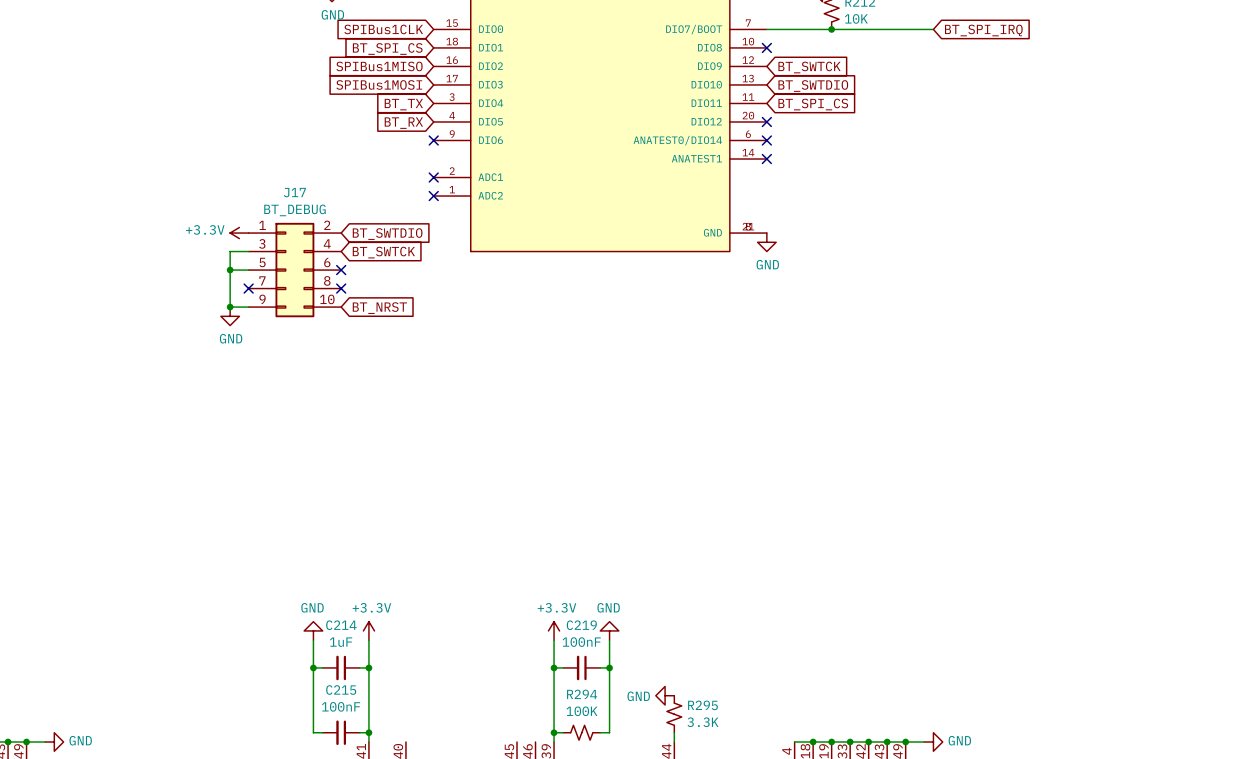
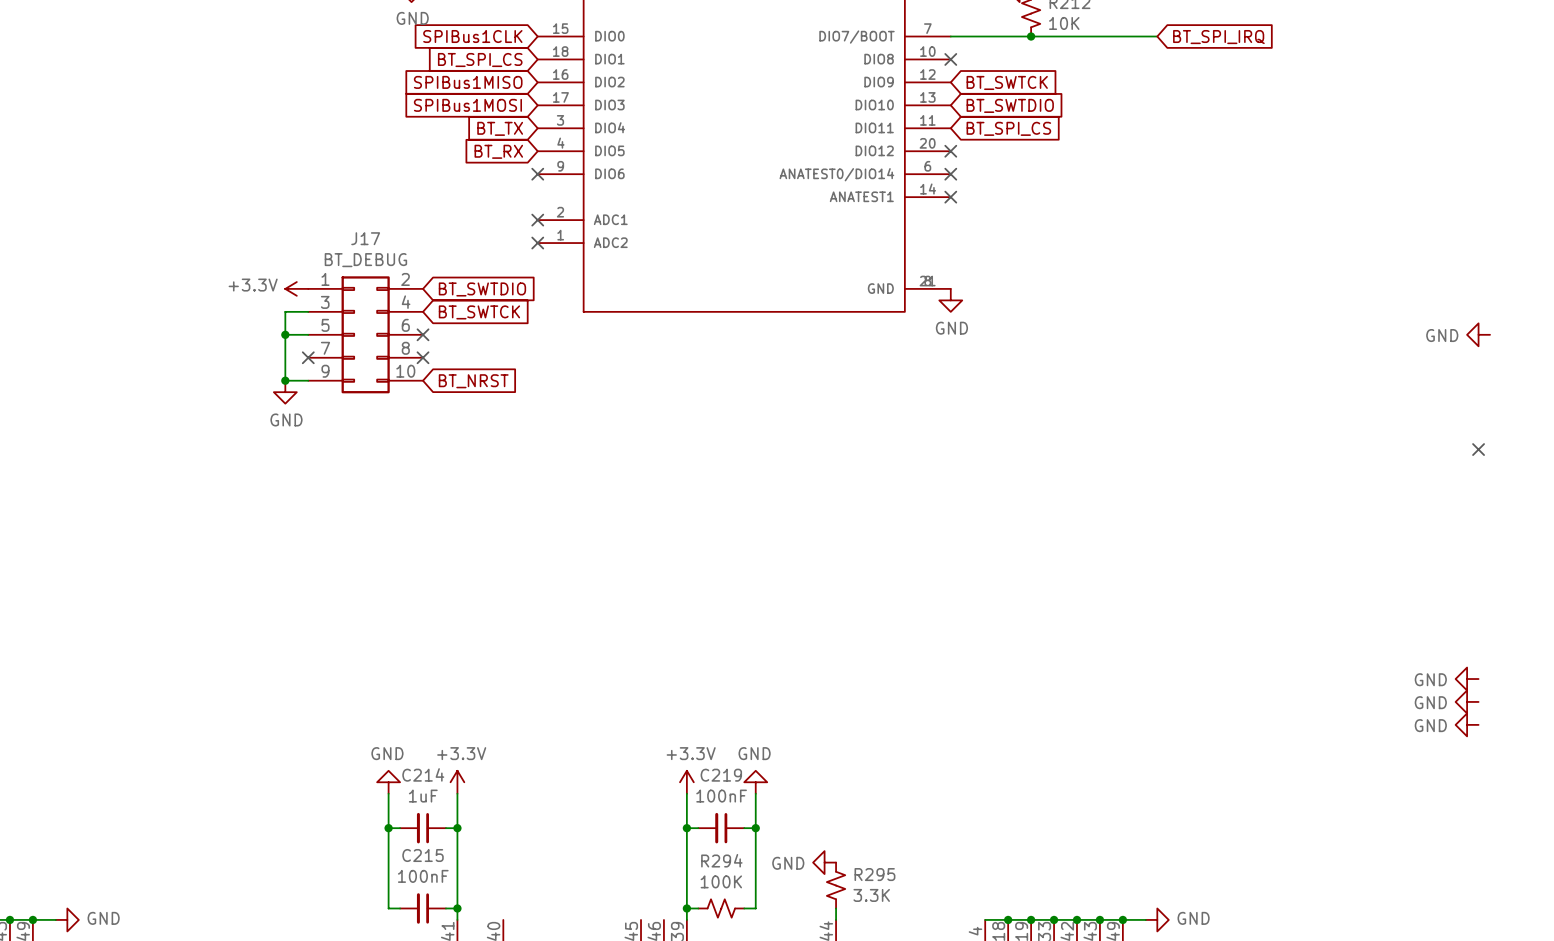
power symbol: none -> GND (1478, 334)
no-connect mark: none -> (1478, 449)
power symbol: none -> GND (1467, 679)
power symbol: none -> GND (1467, 701)
power symbol: none -> GND (1467, 724)

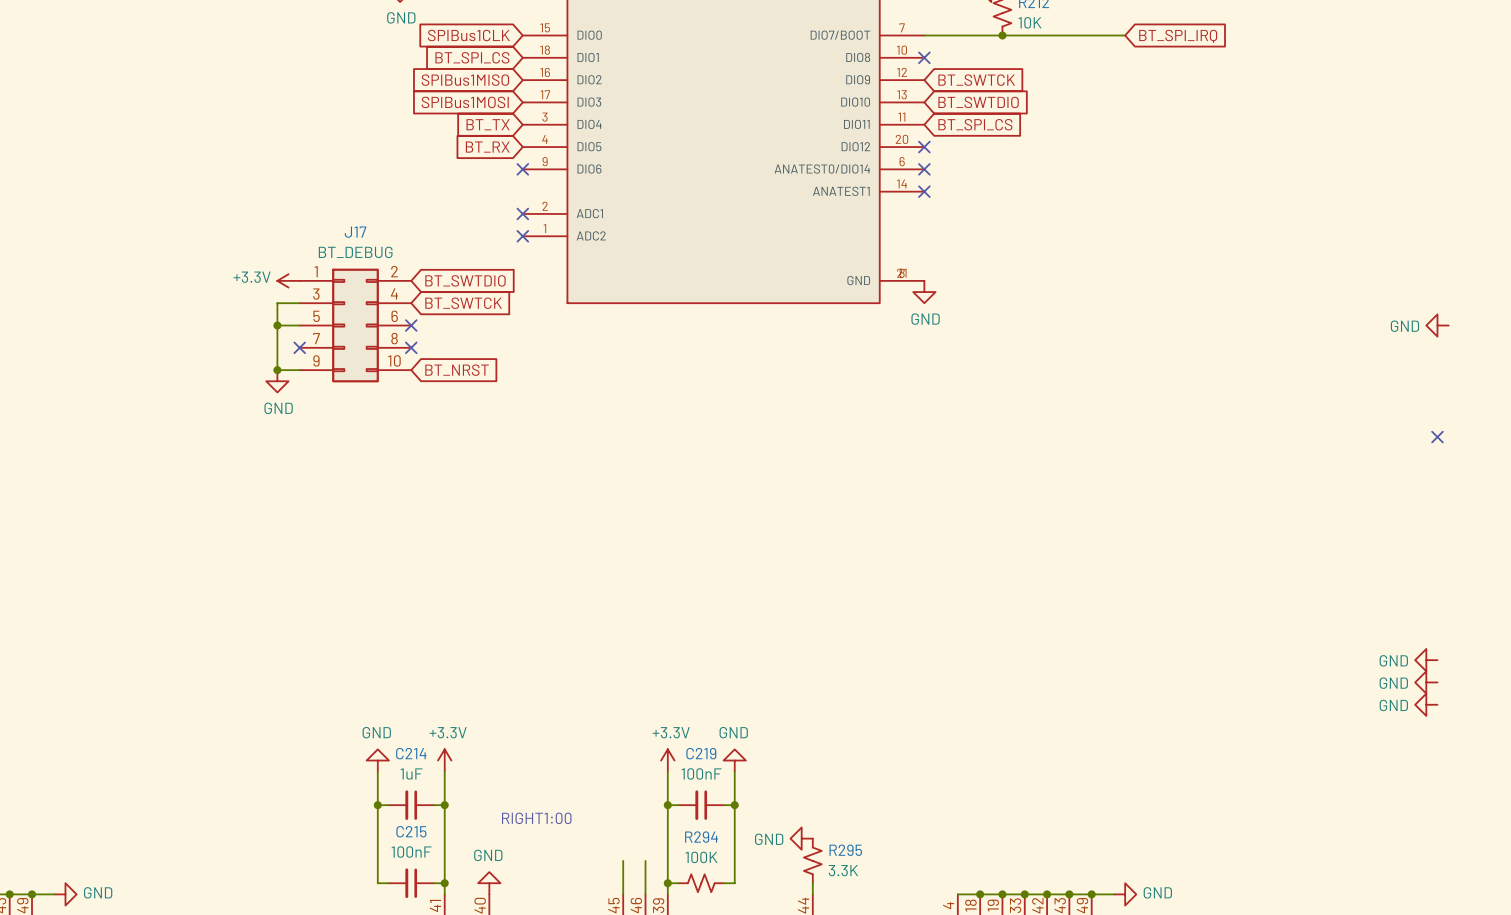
text: none -> RIGHT1:00 (536, 818)
wire: none -> (623, 860) (623, 894)
wire: none -> (645, 860) (645, 894)
power symbol: none -> GND (489, 883)

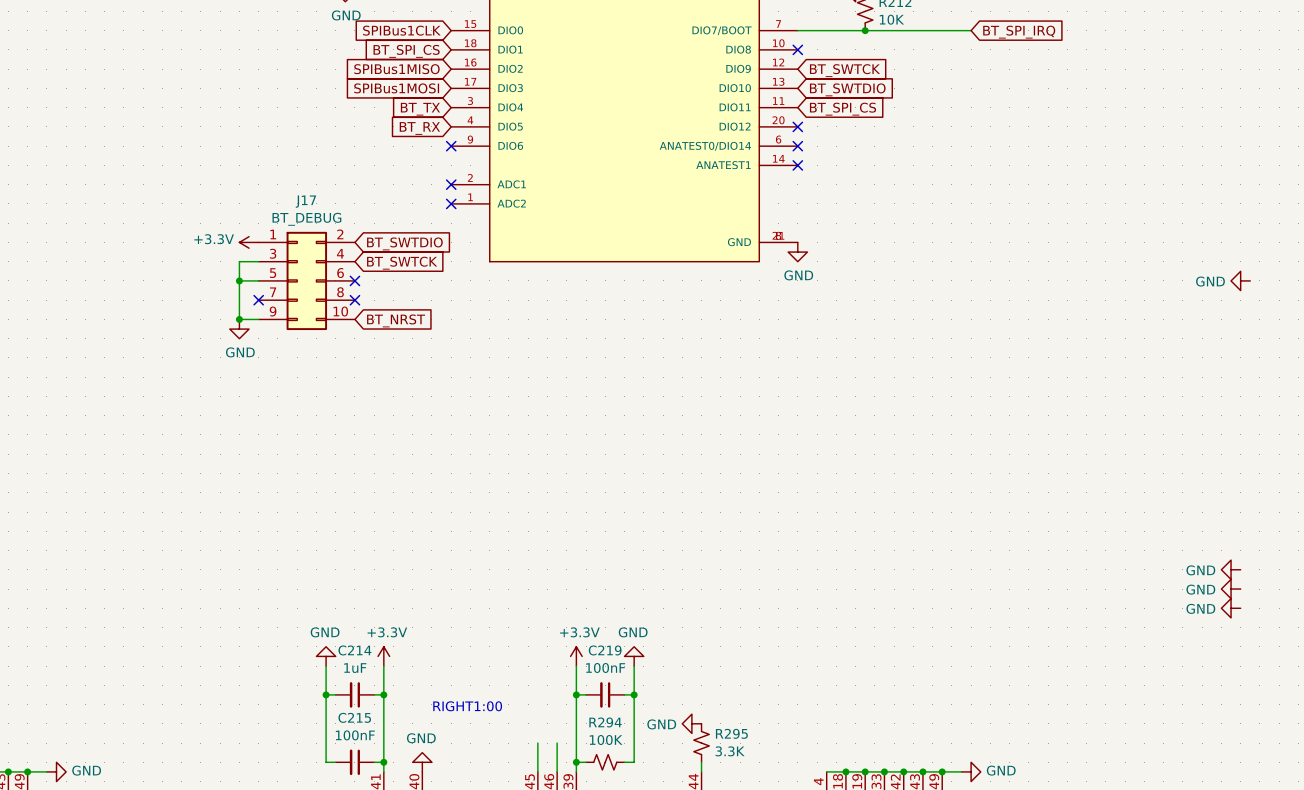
no-connect mark: (1437, 437) -> none

